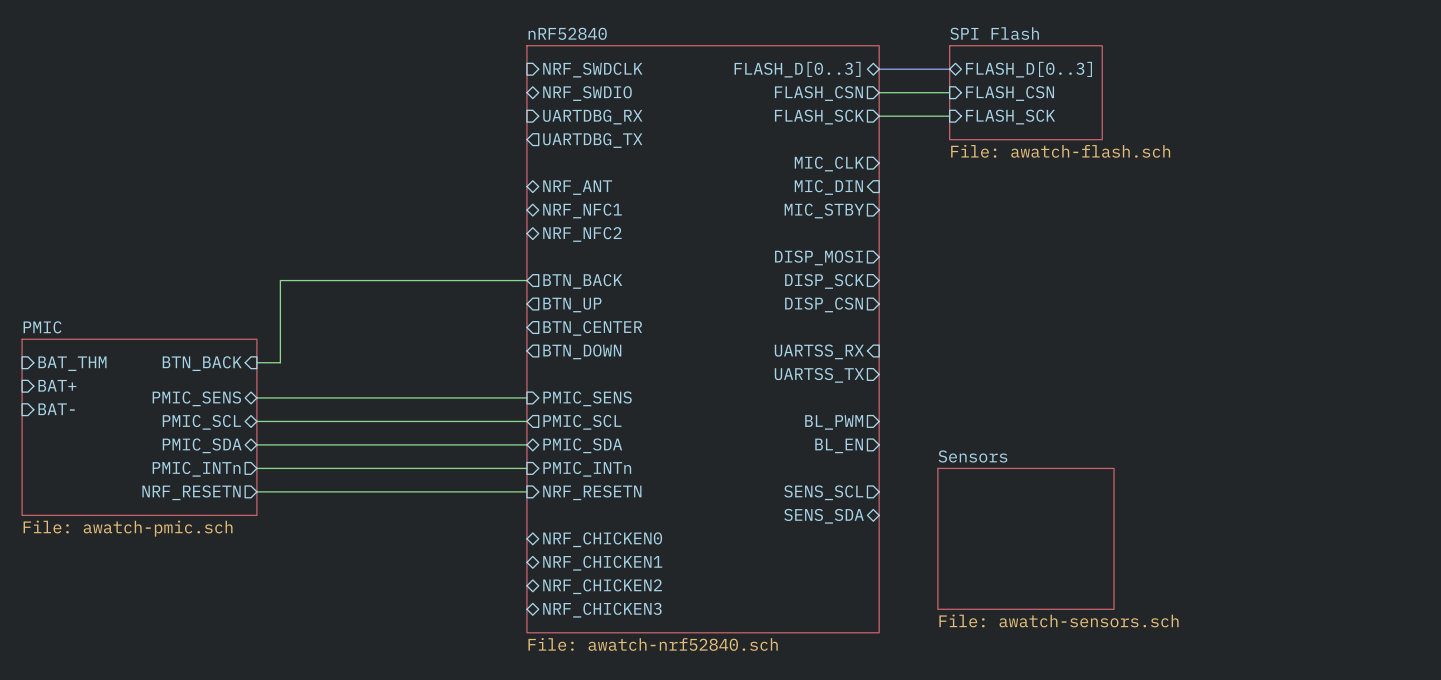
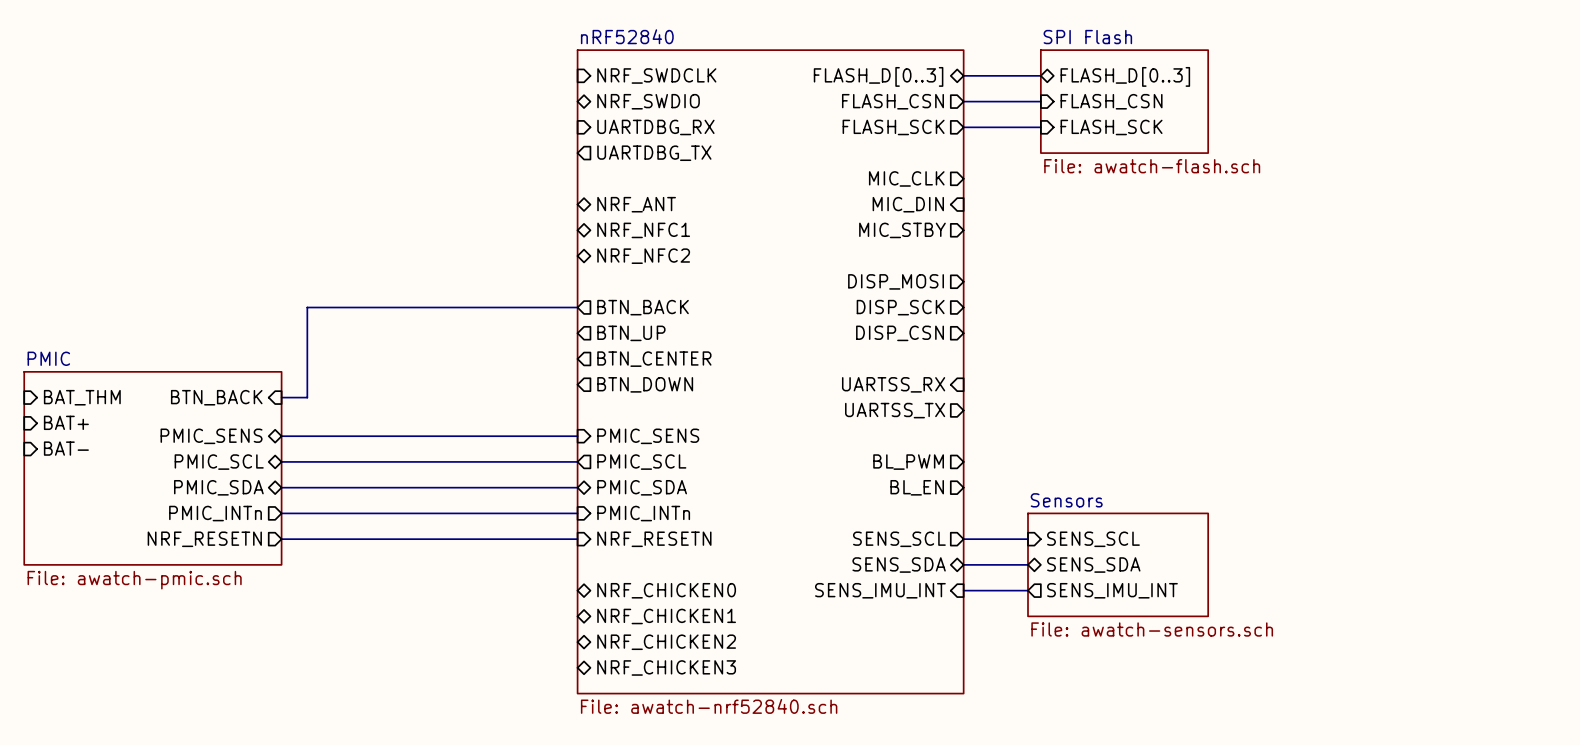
wire: none -> (963, 539) (1028, 539)
sheet pin: none -> SENS_SCL (1093, 539)
wire: none -> (963, 564) (1028, 564)
sheet Sensors: none -> File: awatch-sensors.sch (1118, 564)
sheet pin: none -> SENS_SDA (1093, 565)
wire: none -> (963, 590) (1028, 590)
sheet Sensors: File: awatch-sensors.sch (1025, 538) -> none
sheet pin: none -> SENS_IMU_INT (880, 590)
sheet pin: none -> SENS_IMU_INT (1112, 590)

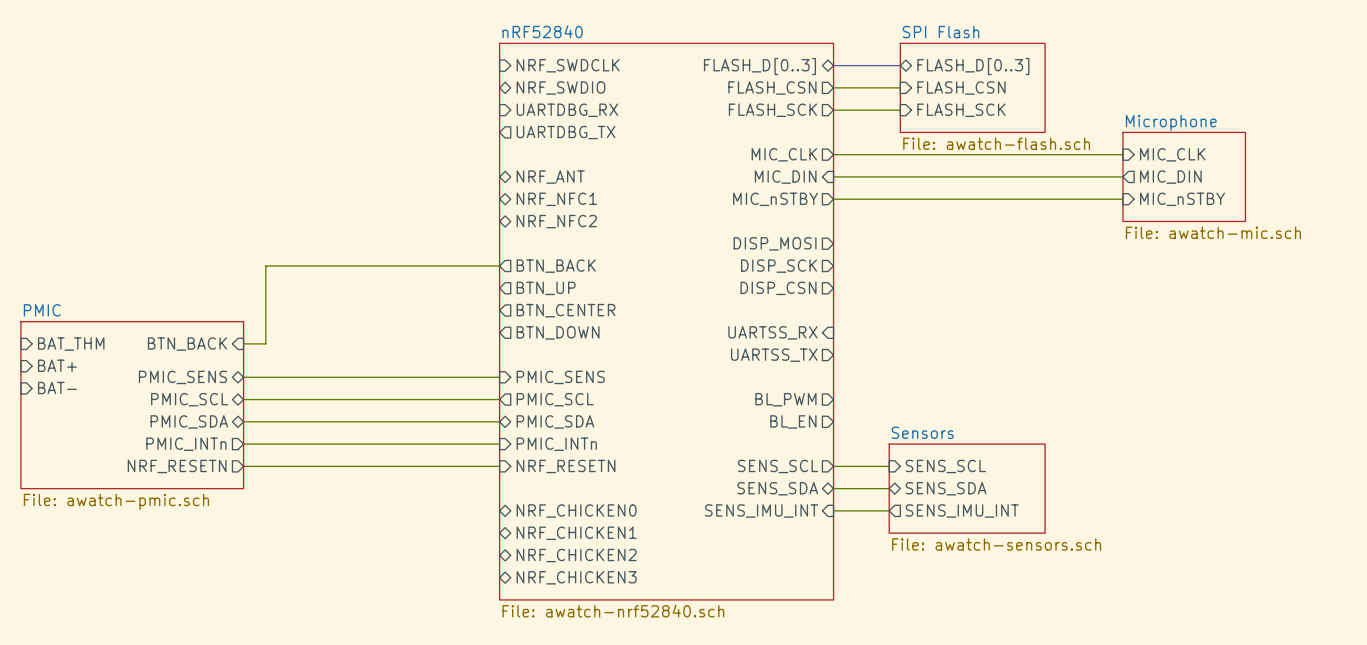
wire: none -> (833, 154) (1122, 154)
sheet pin: none -> MIC_CLK (1172, 154)
wire: none -> (833, 176) (1122, 176)
sheet pin: none -> MIC_DIN (1170, 177)
sheet Microphone: none -> File: awatch-mic.sch (1184, 176)
sheet pin: MIC_STBY (902, 230) -> MIC_nSTBY (775, 199)
wire: none -> (833, 199) (1122, 199)
sheet pin: none -> MIC_nSTBY (1182, 199)

